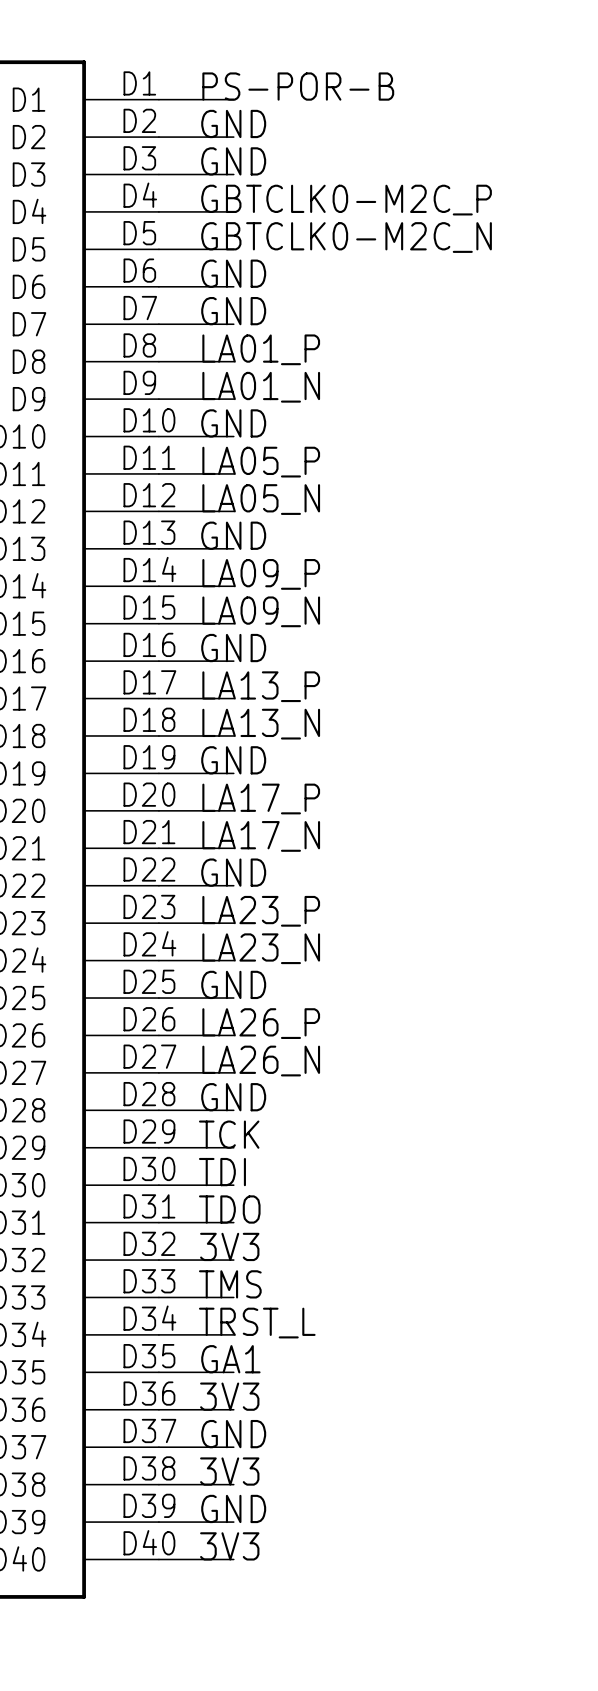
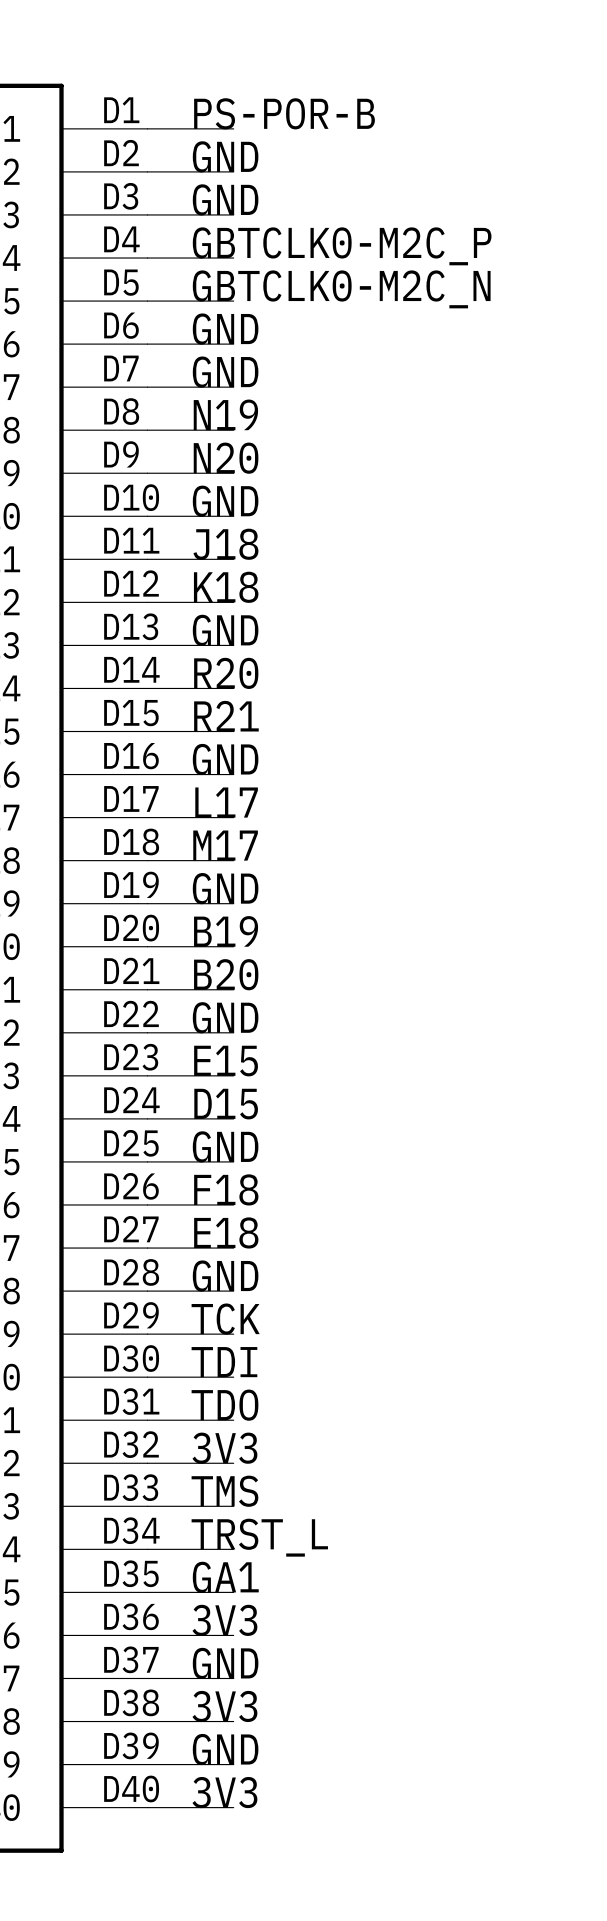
label: LA01_P (261, 349) -> N19 (225, 414)
label: LA01_N (261, 387) -> N20 (226, 458)
label: LA05_P (261, 462) -> J18 (225, 544)
label: LA05_N (261, 499) -> K18 (226, 587)
label: LA09_P (261, 574) -> R20 (226, 673)
label: LA09_N (261, 611) -> R21 (226, 716)
label: LA13_P (261, 686) -> L17 (226, 802)
label: LA13_N (261, 724) -> M17 (225, 845)
label: LA17_P (261, 799) -> B19 (226, 931)
label: LA17_N (261, 836) -> B20 (226, 974)
label: LA23_P (261, 911) -> E15 (226, 1061)
label: LA23_N (261, 948) -> D15 (226, 1104)
label: LA26_P (261, 1023) -> F18 (226, 1189)
label: LA26_N (261, 1061) -> E18 (226, 1232)

